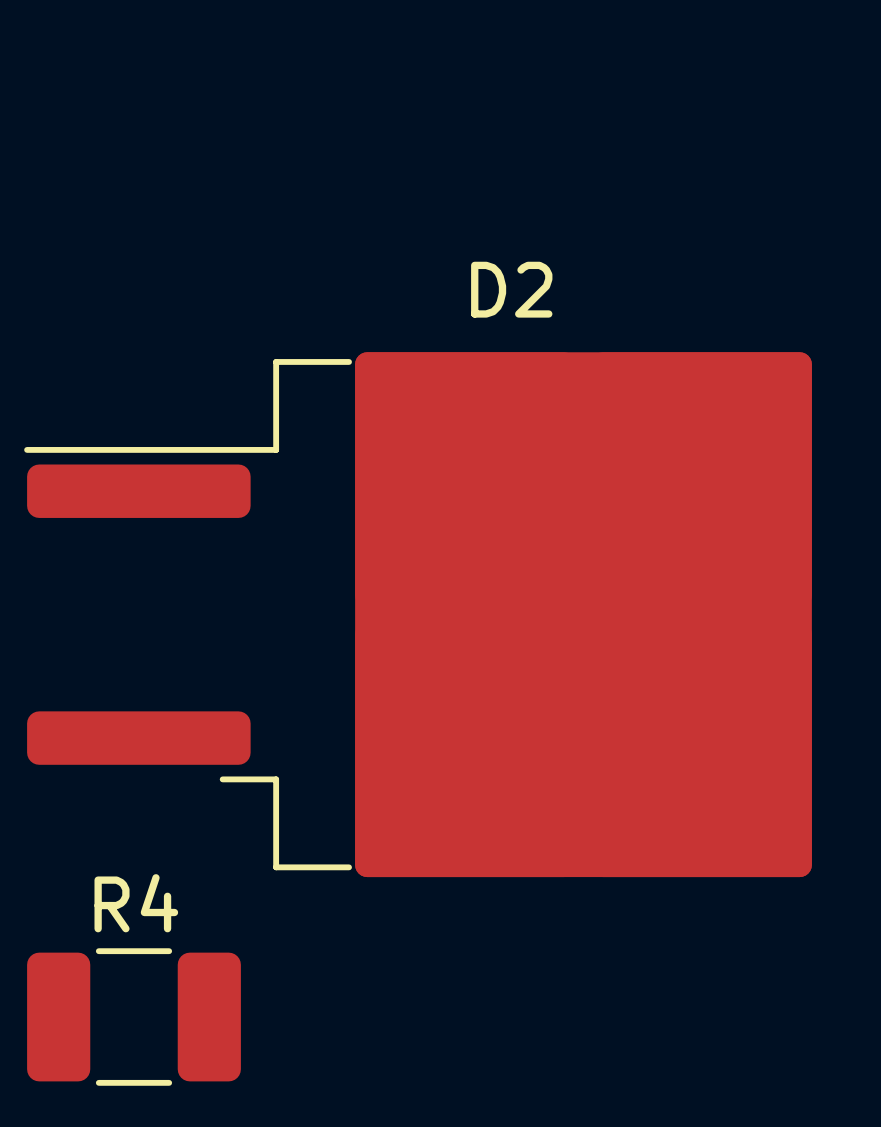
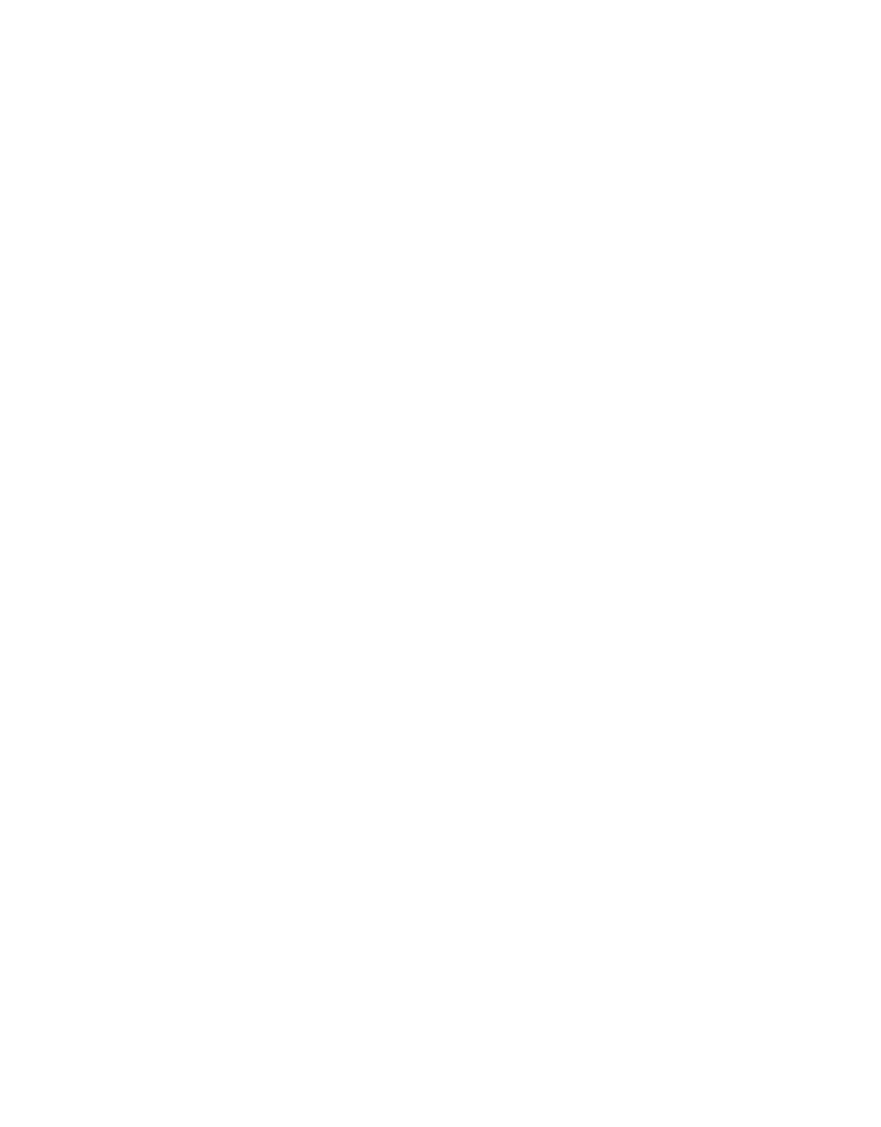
D2: (418, 614) -> none
R4: (133, 1017) -> none

